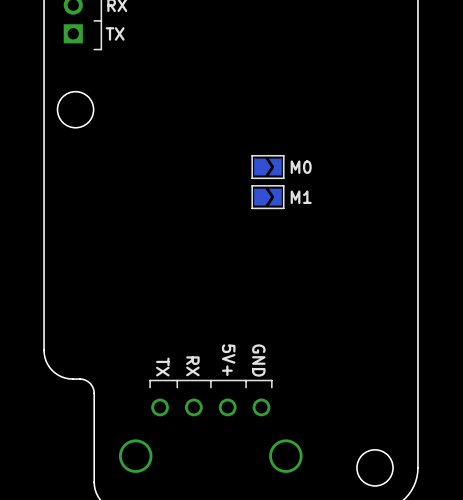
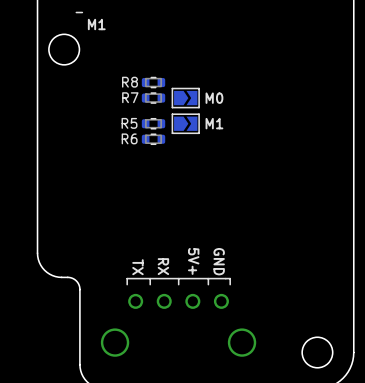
line: none -> (82, 12) (76, 12)
text: none -> M1 (96, 24)
R8: none -> (153, 82)
R7: none -> (153, 98)
part: none -> (185, 98)
part: (267, 167) -> none
text position: M0 (301, 167) -> M0 (214, 98)
R5: none -> (153, 123)
part: none -> (185, 123)
part: (267, 197) -> none
text position: M1 (301, 197) -> M1 (214, 123)
R6: none -> (153, 139)

